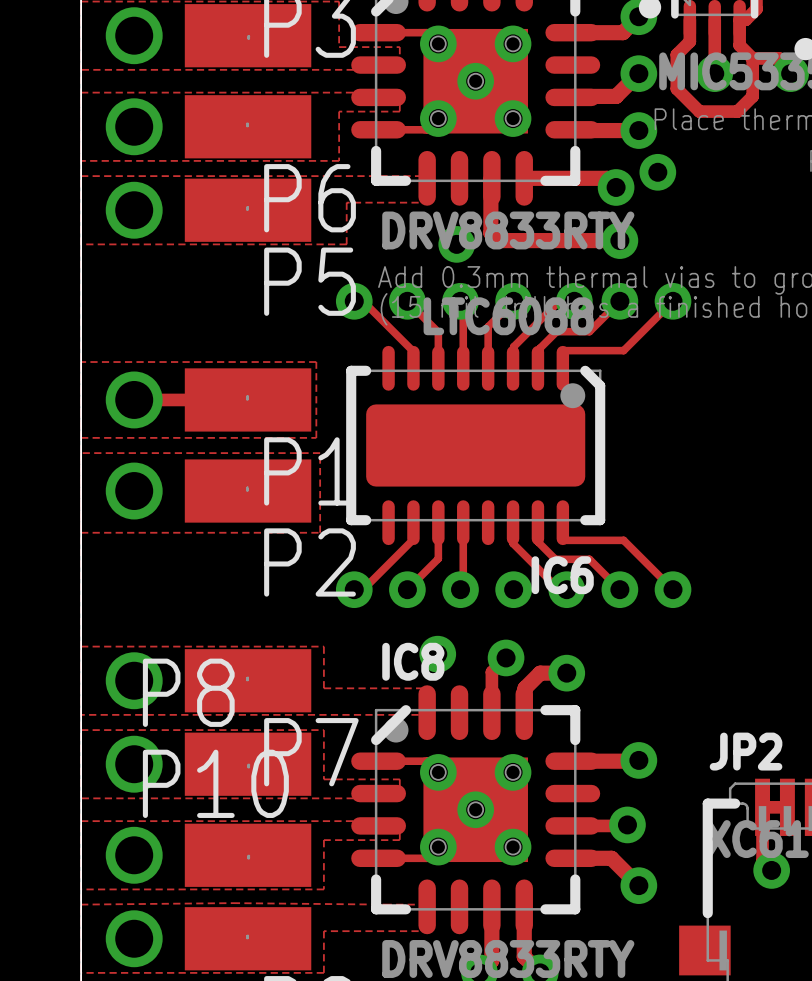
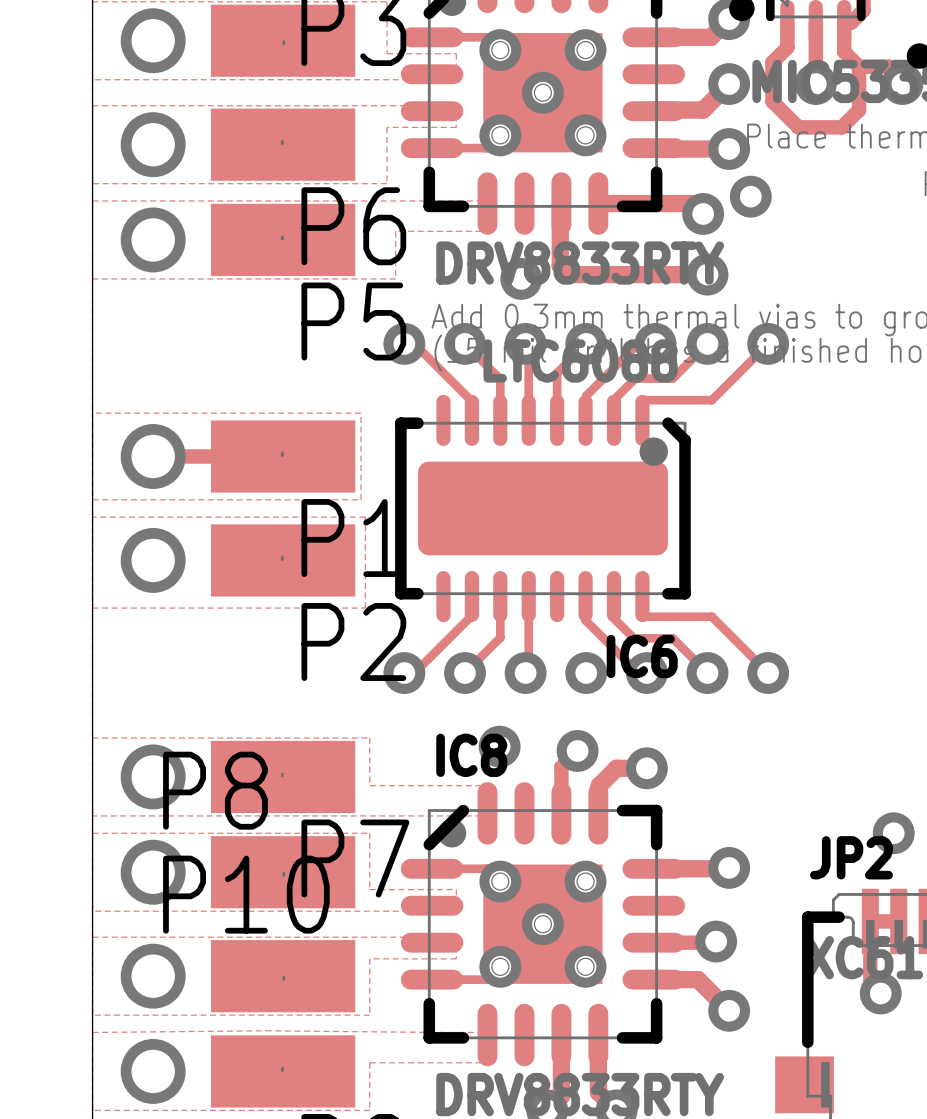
via: none -> (893, 833)

